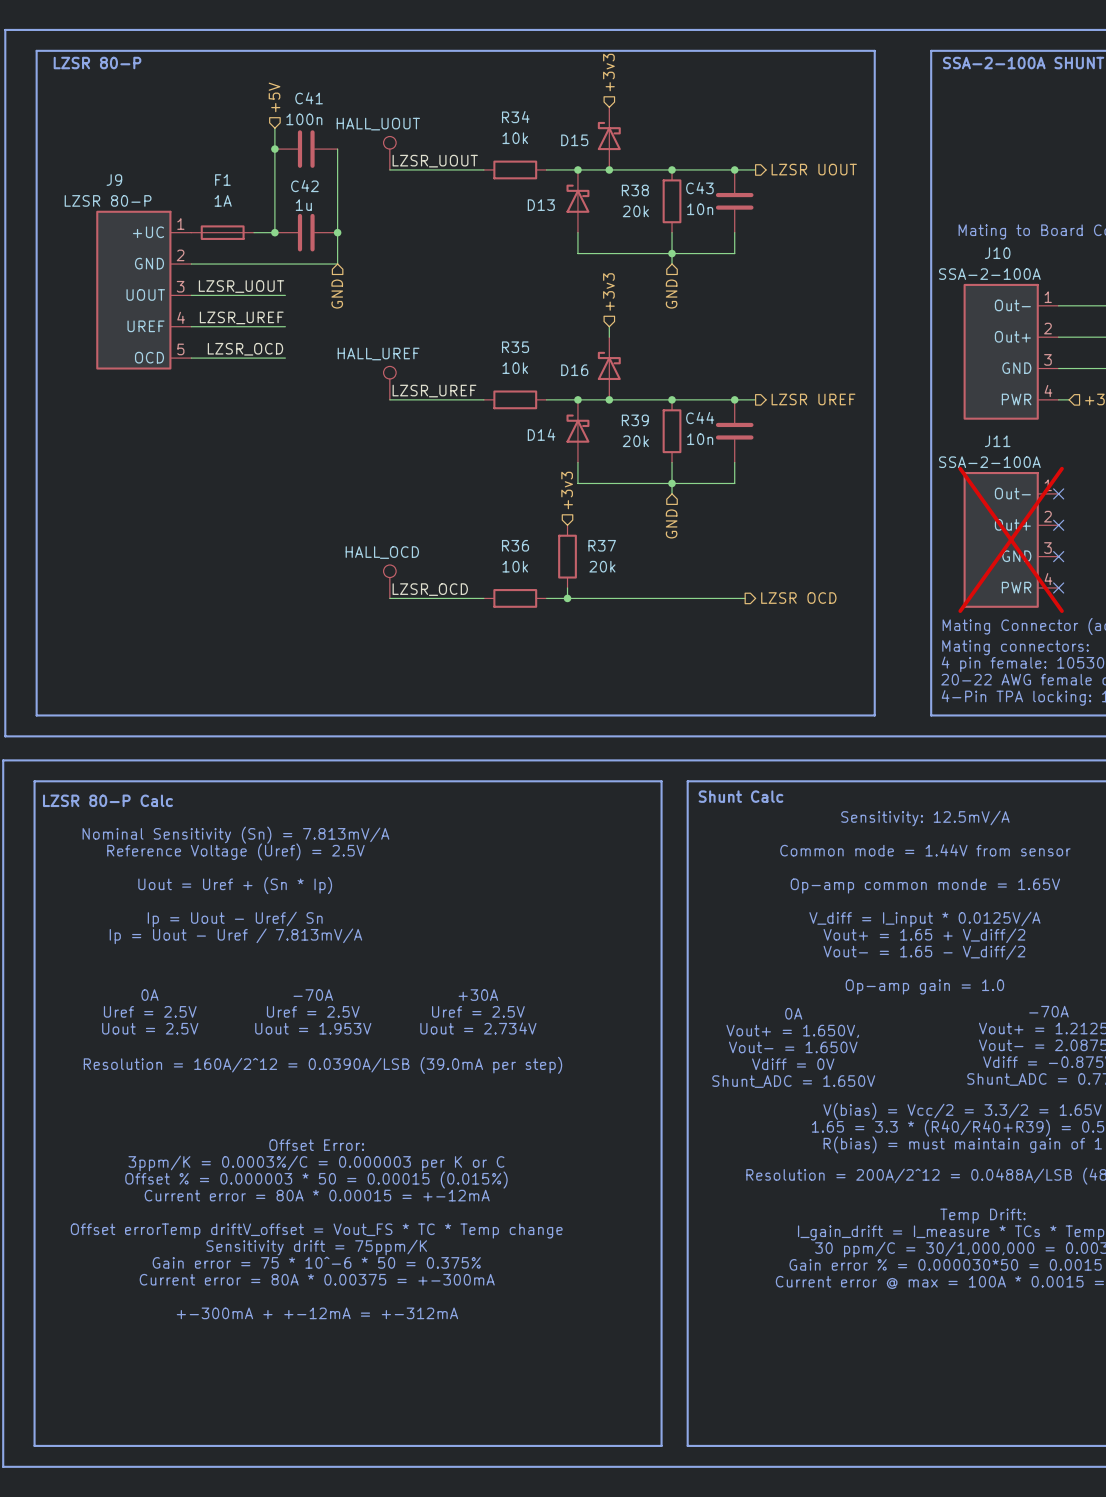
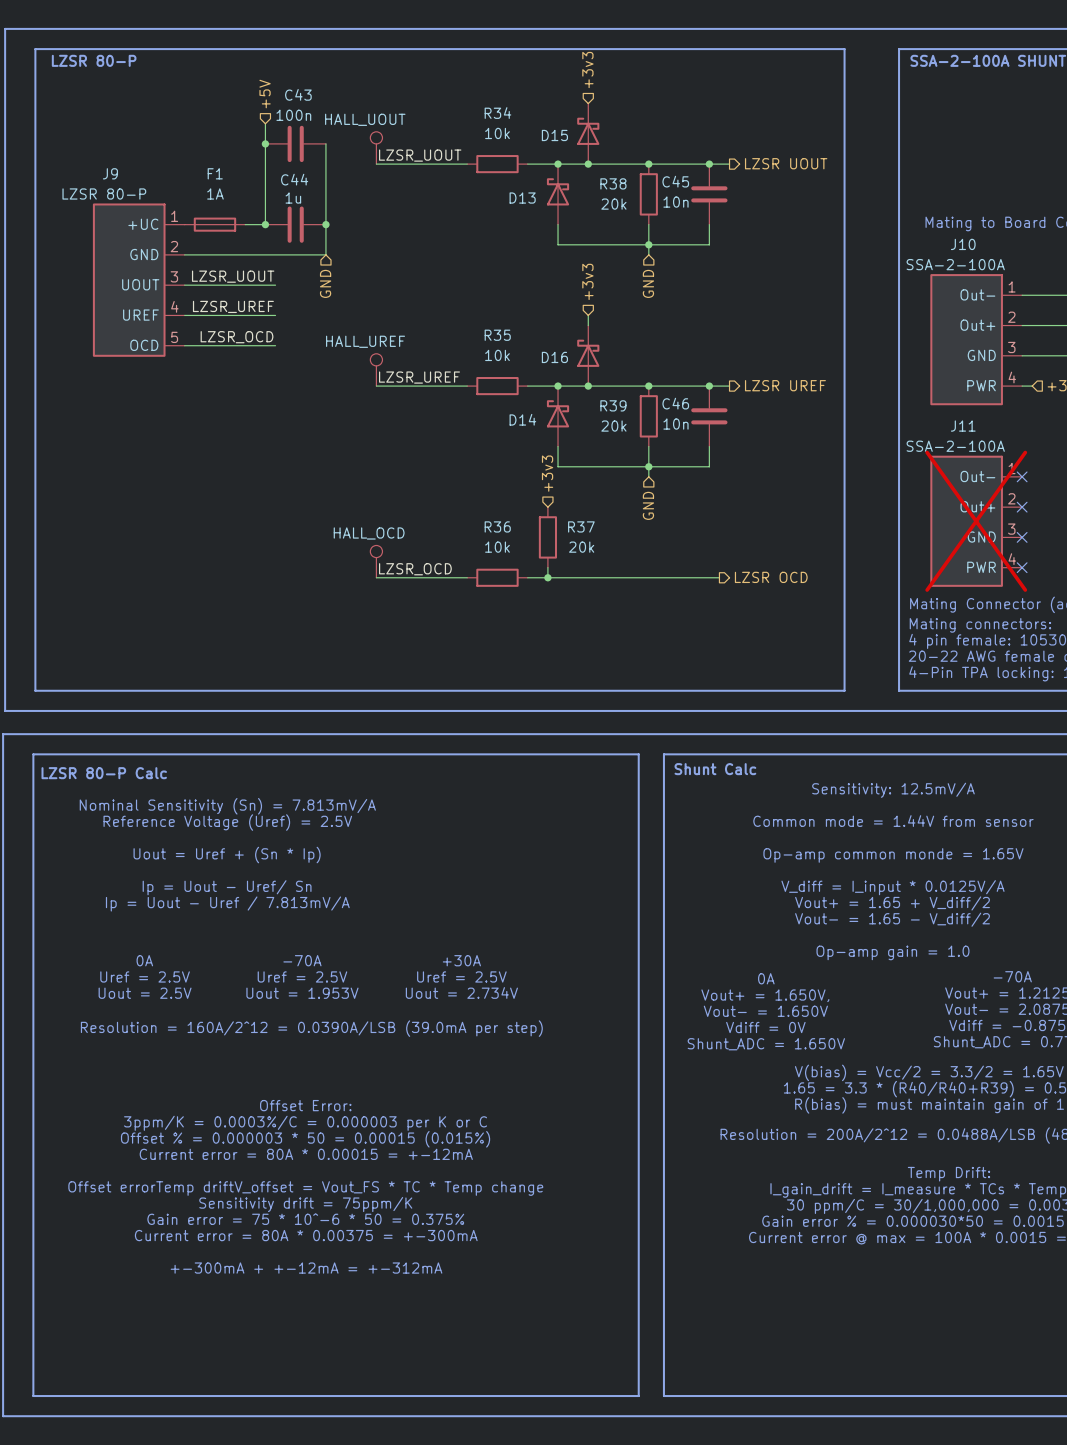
C41 name: C41 (309, 98) -> C43 (298, 94)
C42 name: C42 (304, 186) -> C44 (294, 179)
C43 name: C43 (699, 188) -> C45 (675, 181)
C44 name: C44 (700, 418) -> C46 (675, 403)

